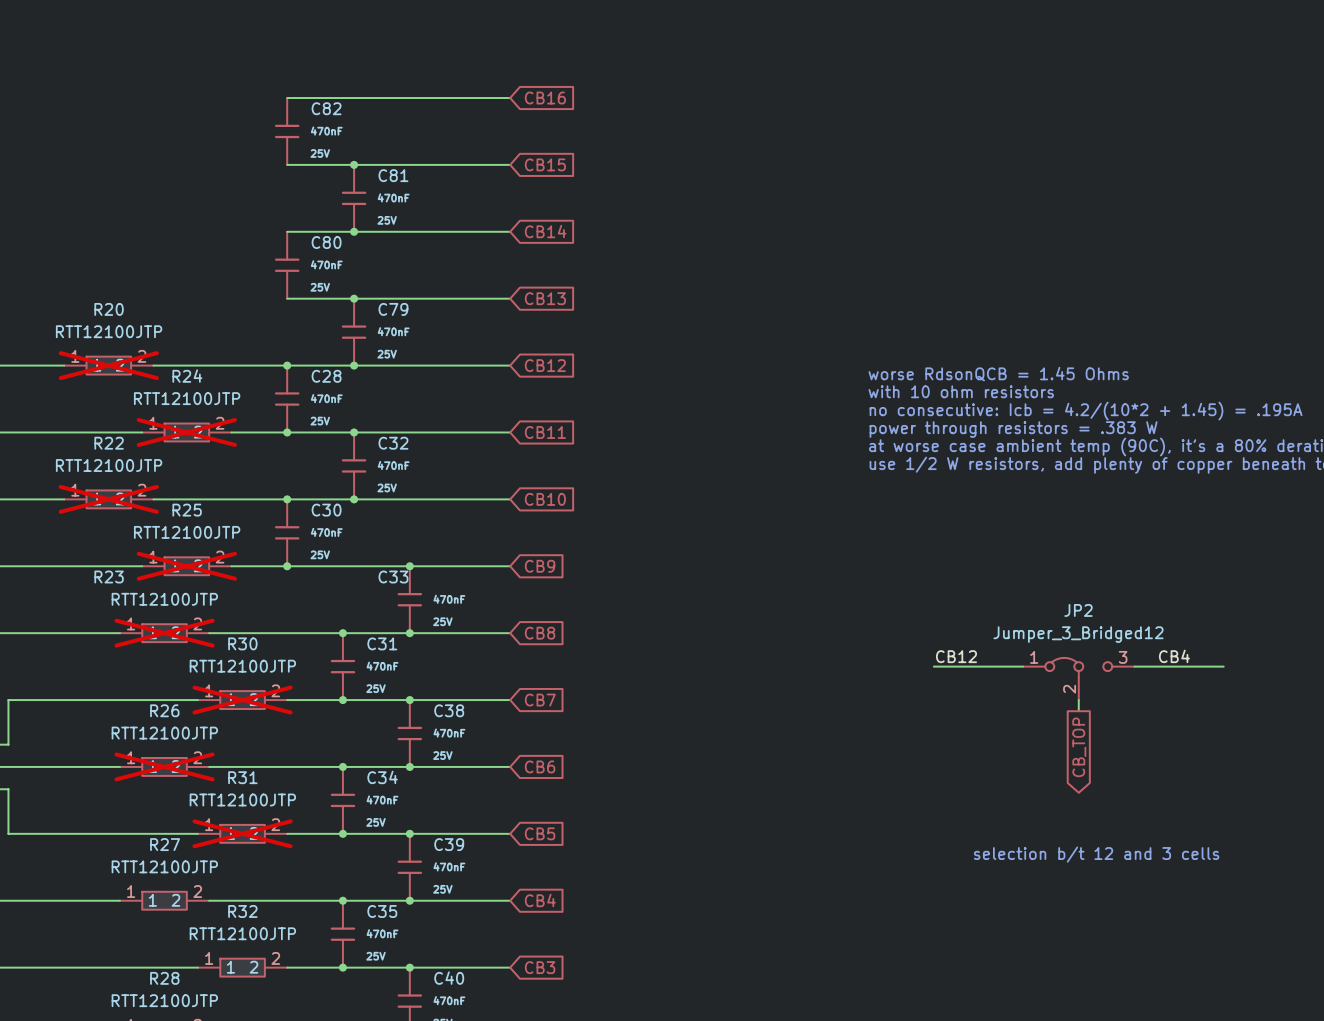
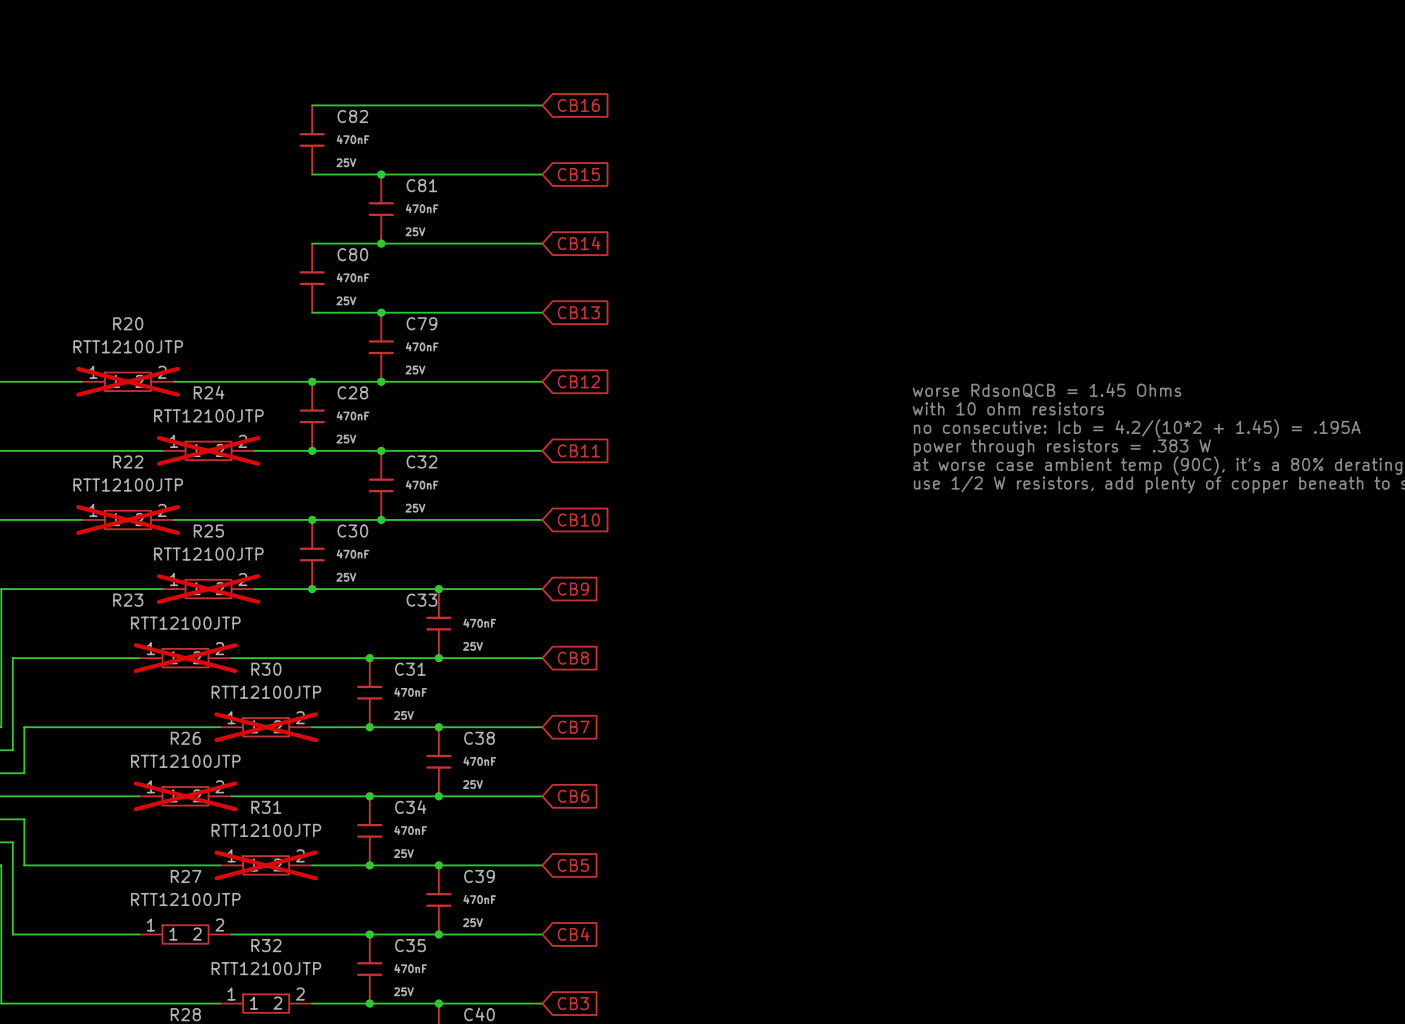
label: CB12 (956, 656) -> none
label: CB4 (1174, 656) -> none
wire: (933, 666) (1023, 666) -> none
wire: (1134, 666) (1223, 666) -> none
JP2: Jumper_3_Bridged12 (1078, 678) -> none
wire: (1078, 700) (1078, 711) -> none
global label: CB_TOP (1079, 747) -> none
text: selection b/t 12 and 3 cells (1096, 854) -> none

